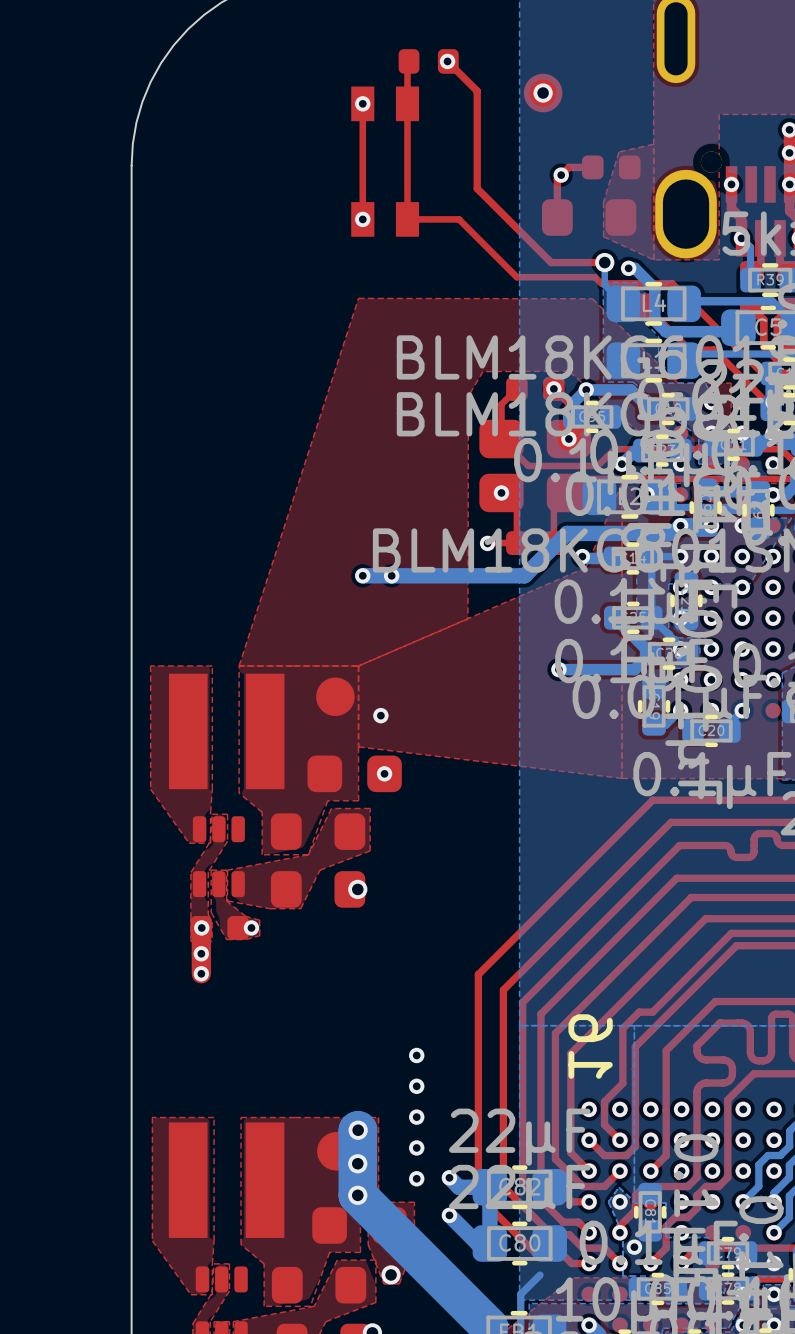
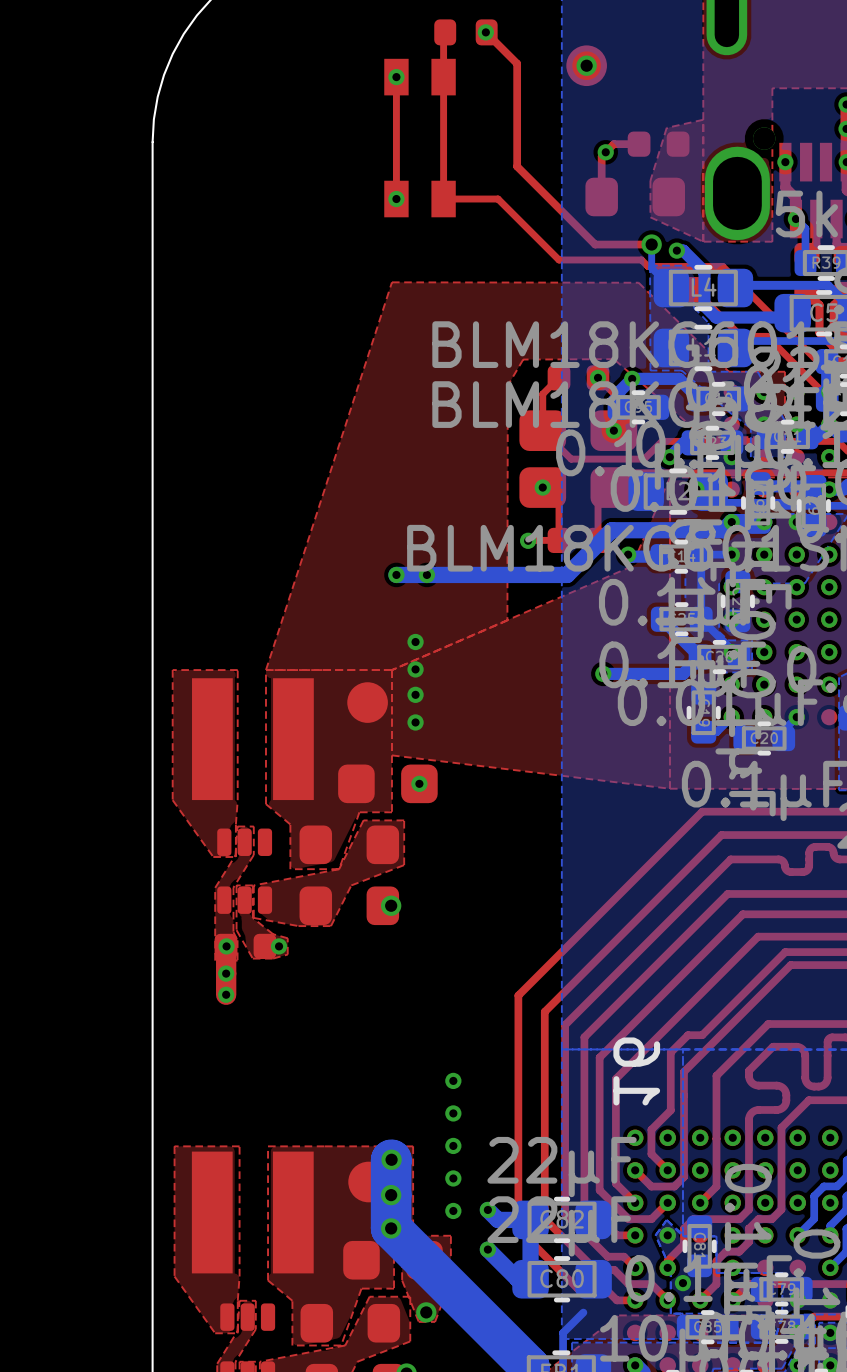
via: none -> (415, 642)
via: none -> (415, 669)
via: none -> (415, 694)

